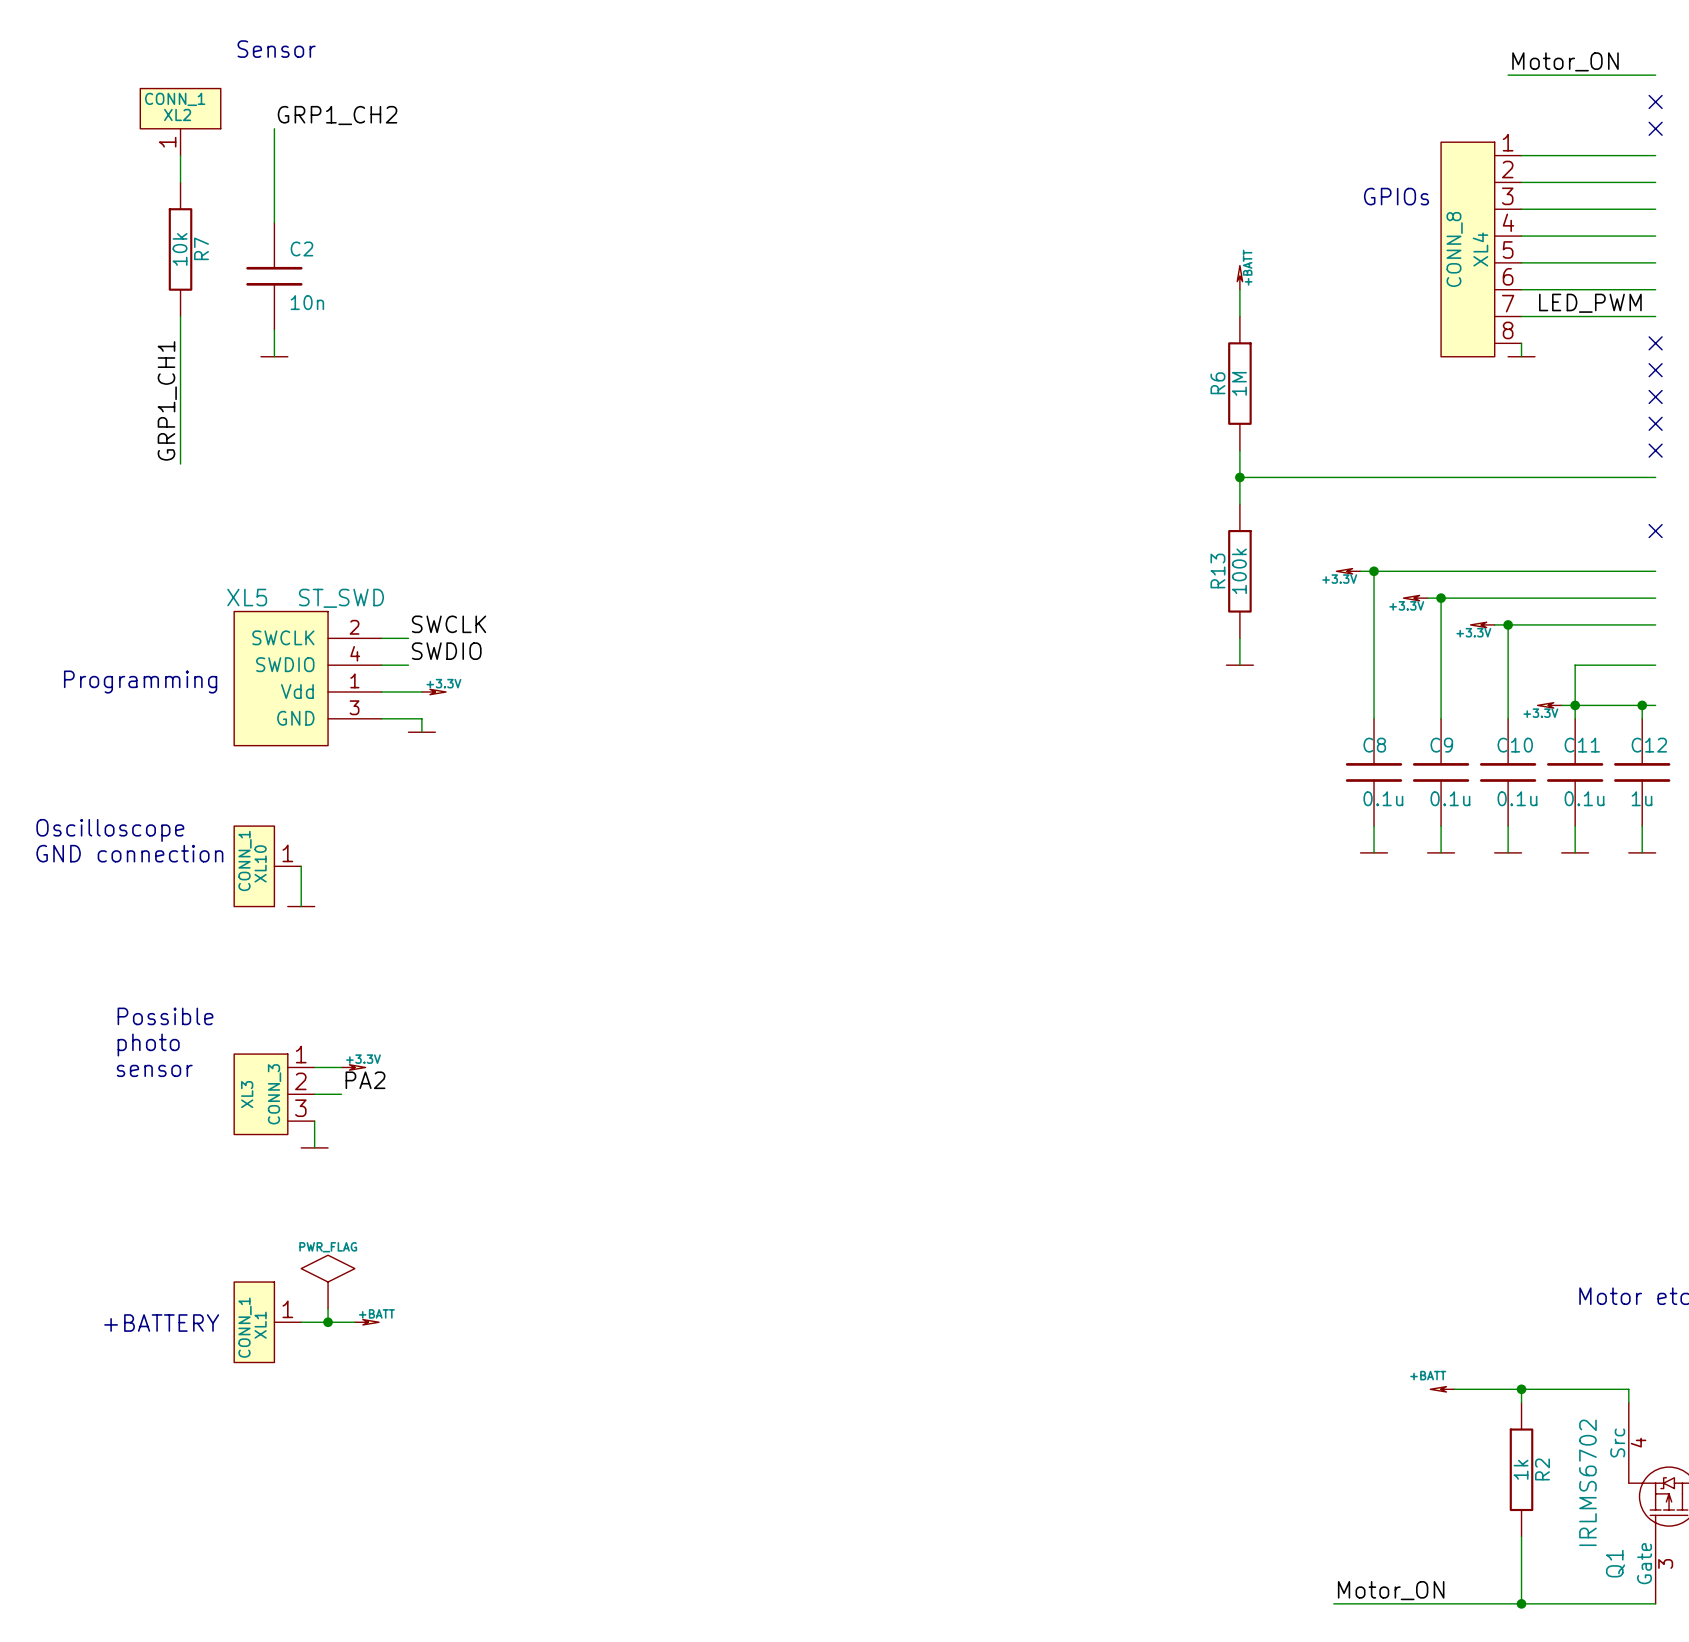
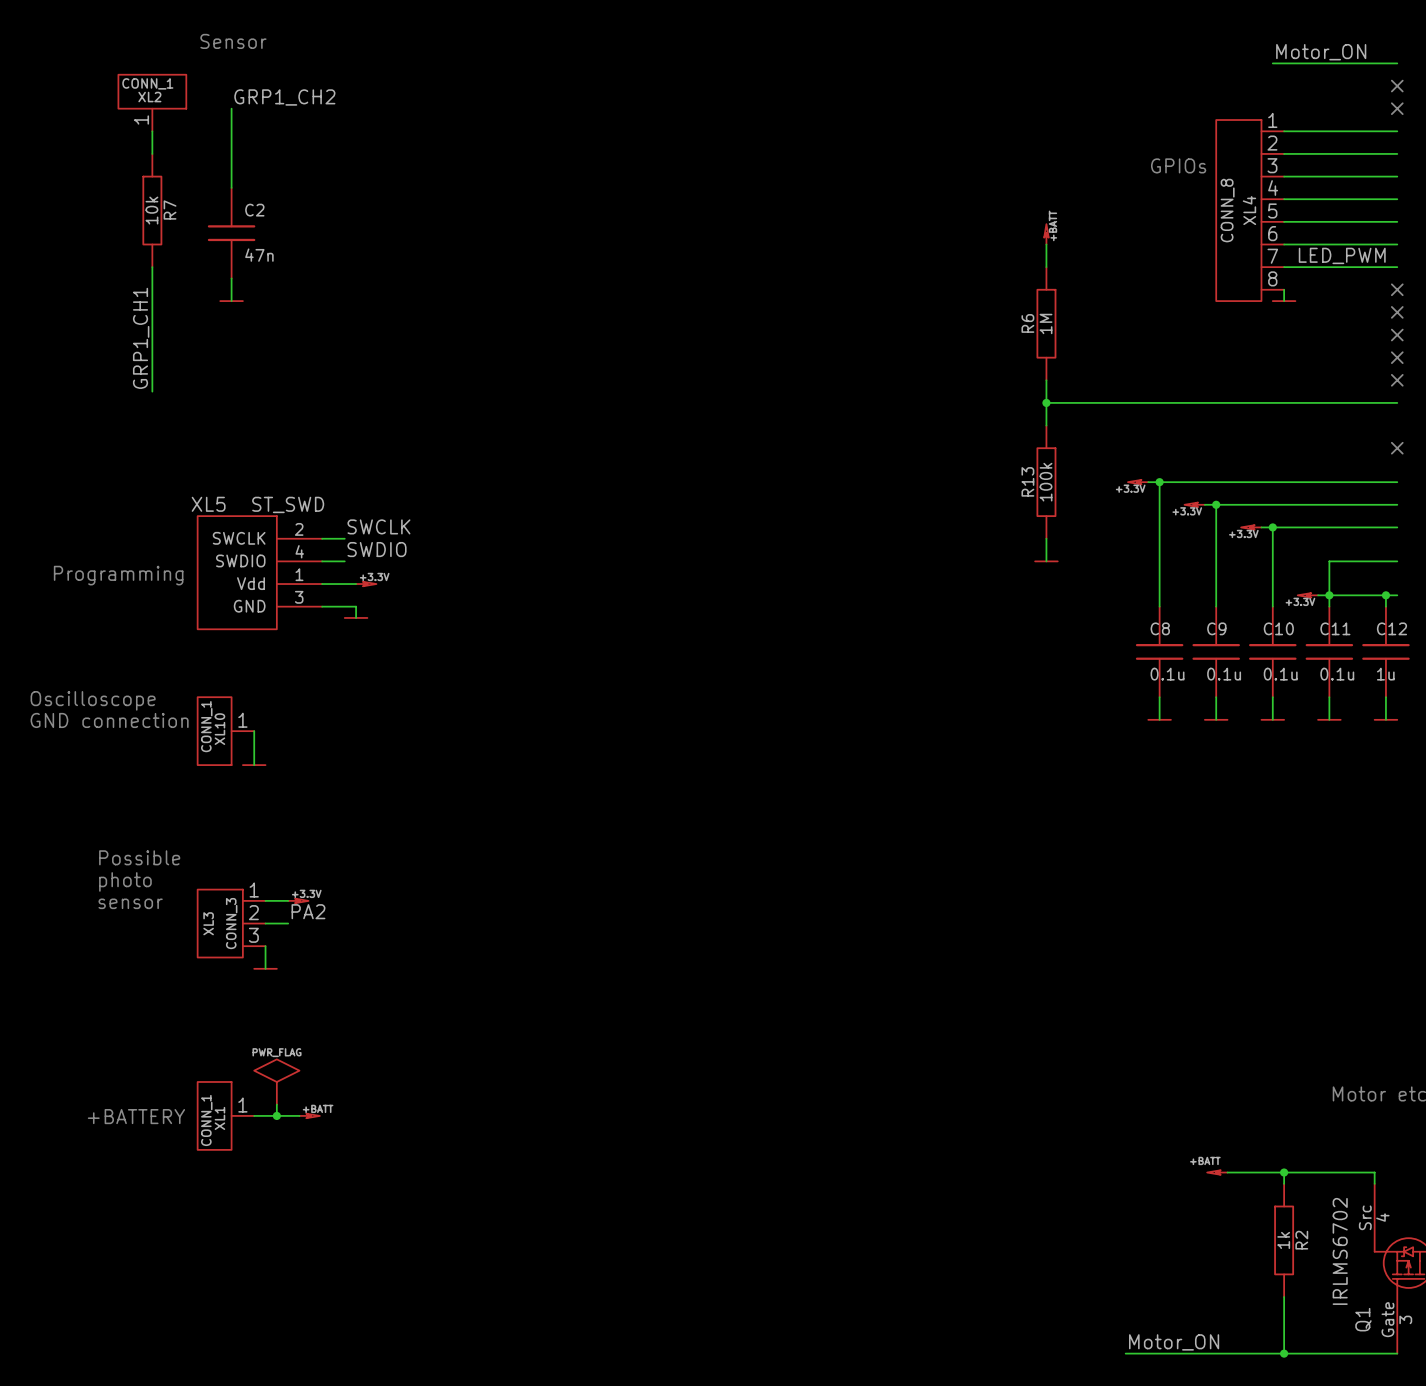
C2 value: 10n (307, 302) -> 47n (259, 255)

